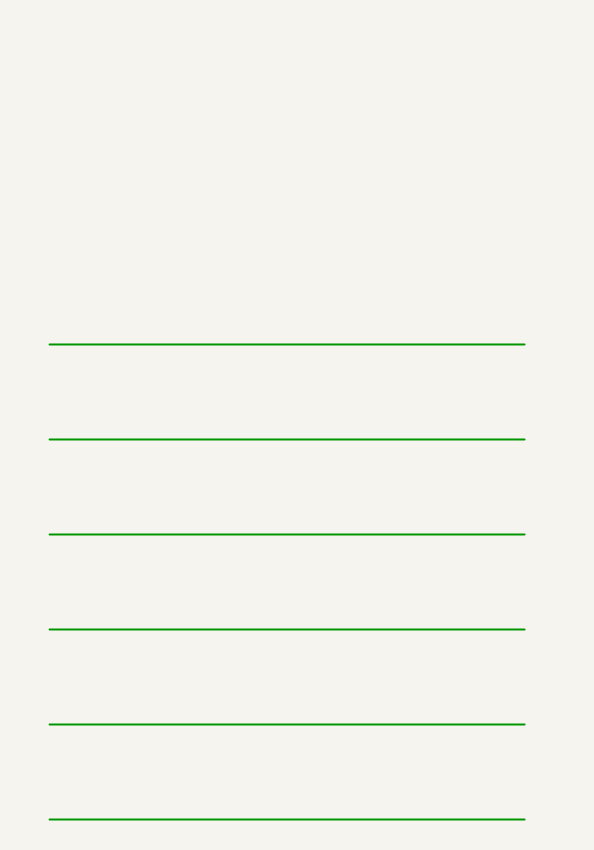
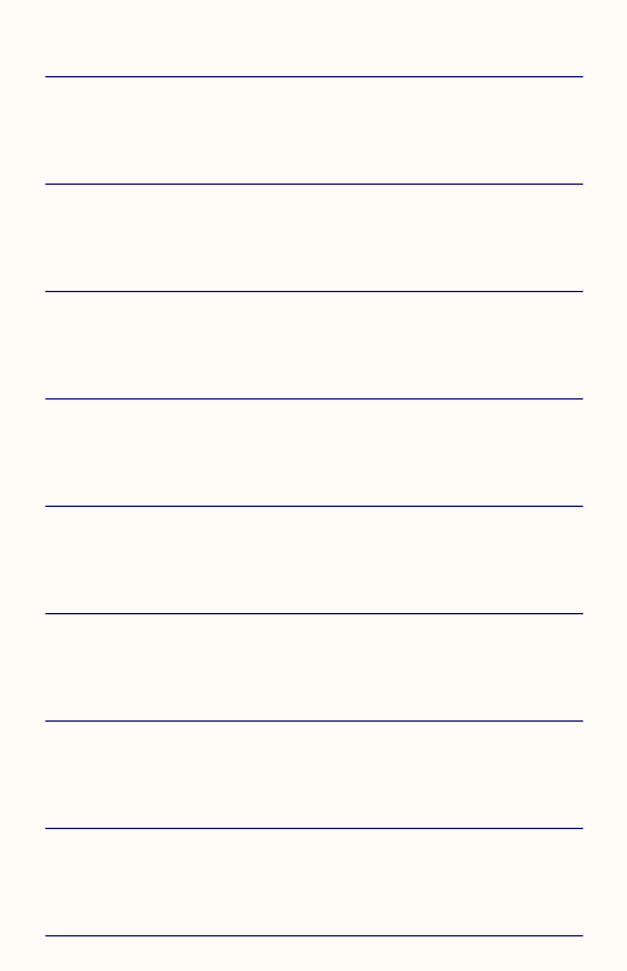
wire: none -> (45, 76) (582, 76)
wire: none -> (45, 184) (582, 184)
wire: none -> (45, 291) (582, 291)

